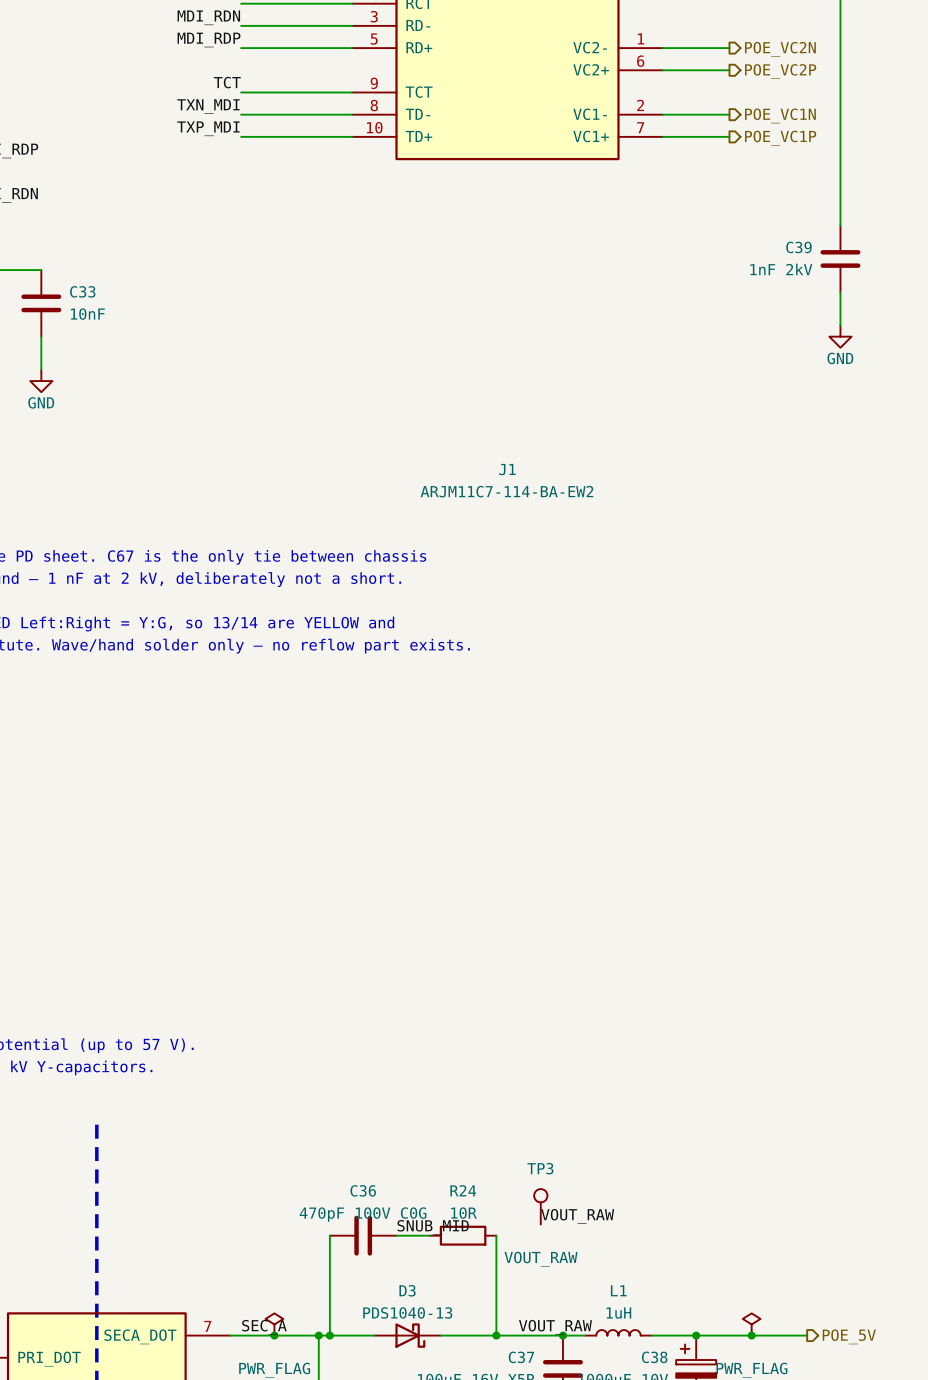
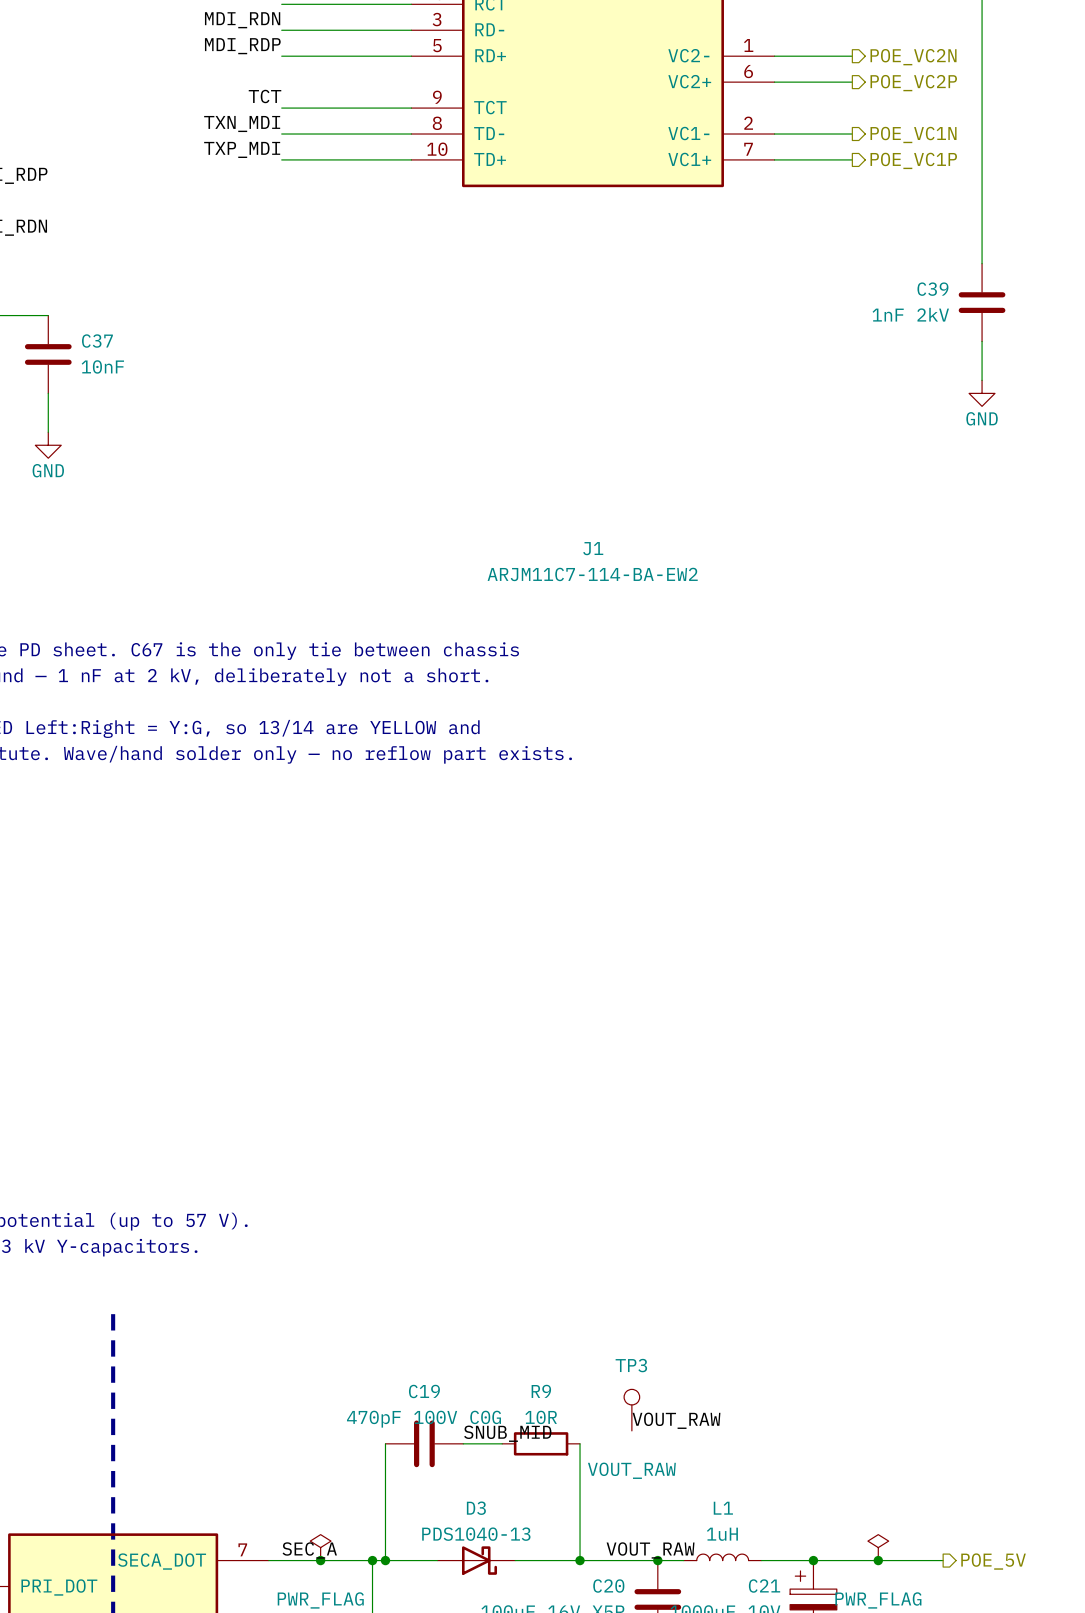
C33 name: C33 (82, 291) -> C37 (97, 341)
C36 name: C36 (363, 1190) -> C19 (424, 1391)
R24 name: R24 (463, 1190) -> R9 (541, 1391)
C37 name: C37 (521, 1357) -> C20 (608, 1586)
C38 name: C38 (654, 1357) -> C21 (764, 1586)

